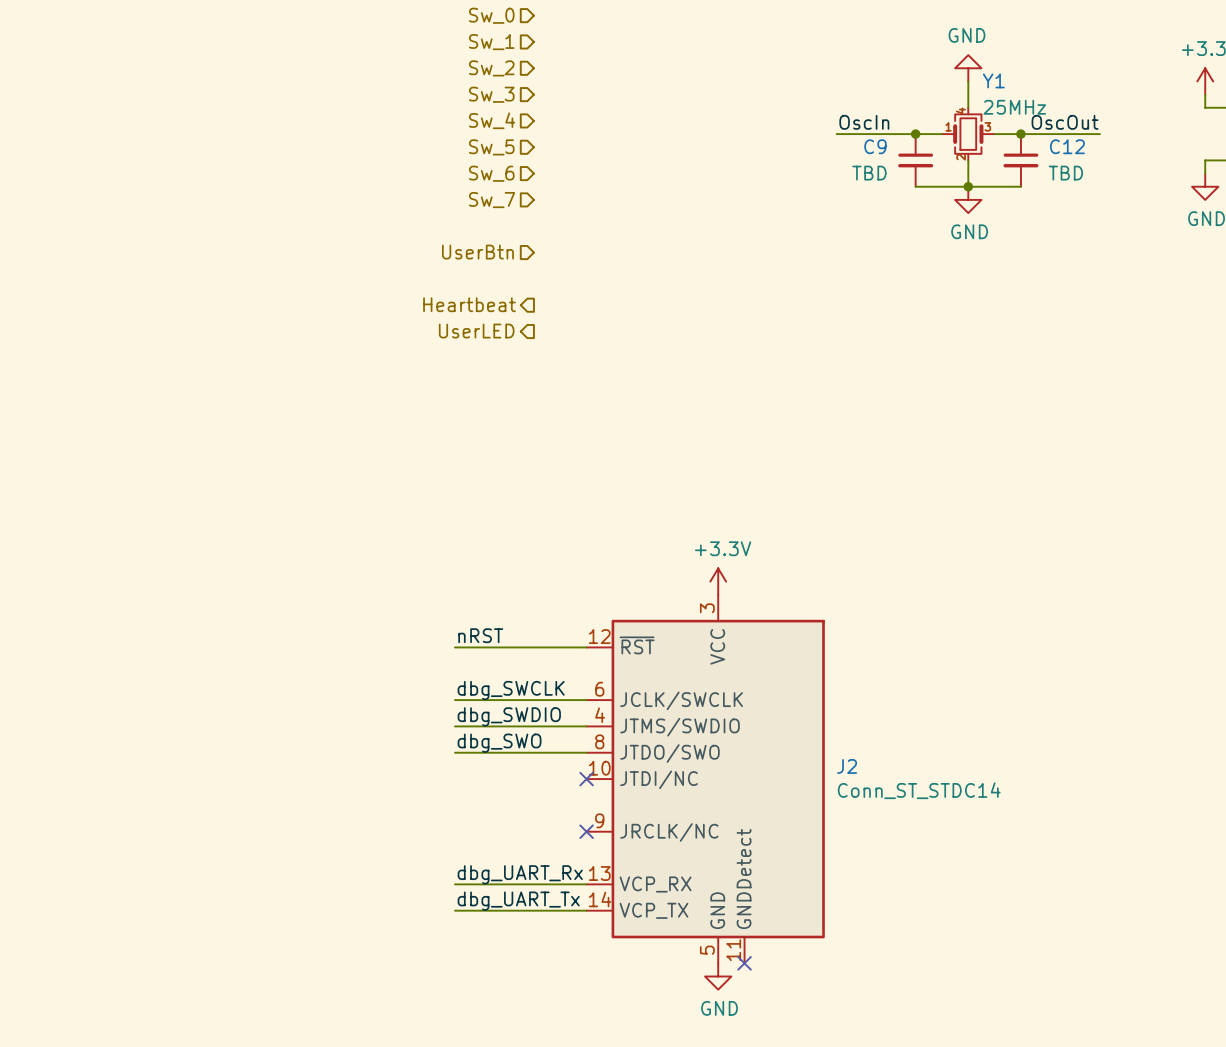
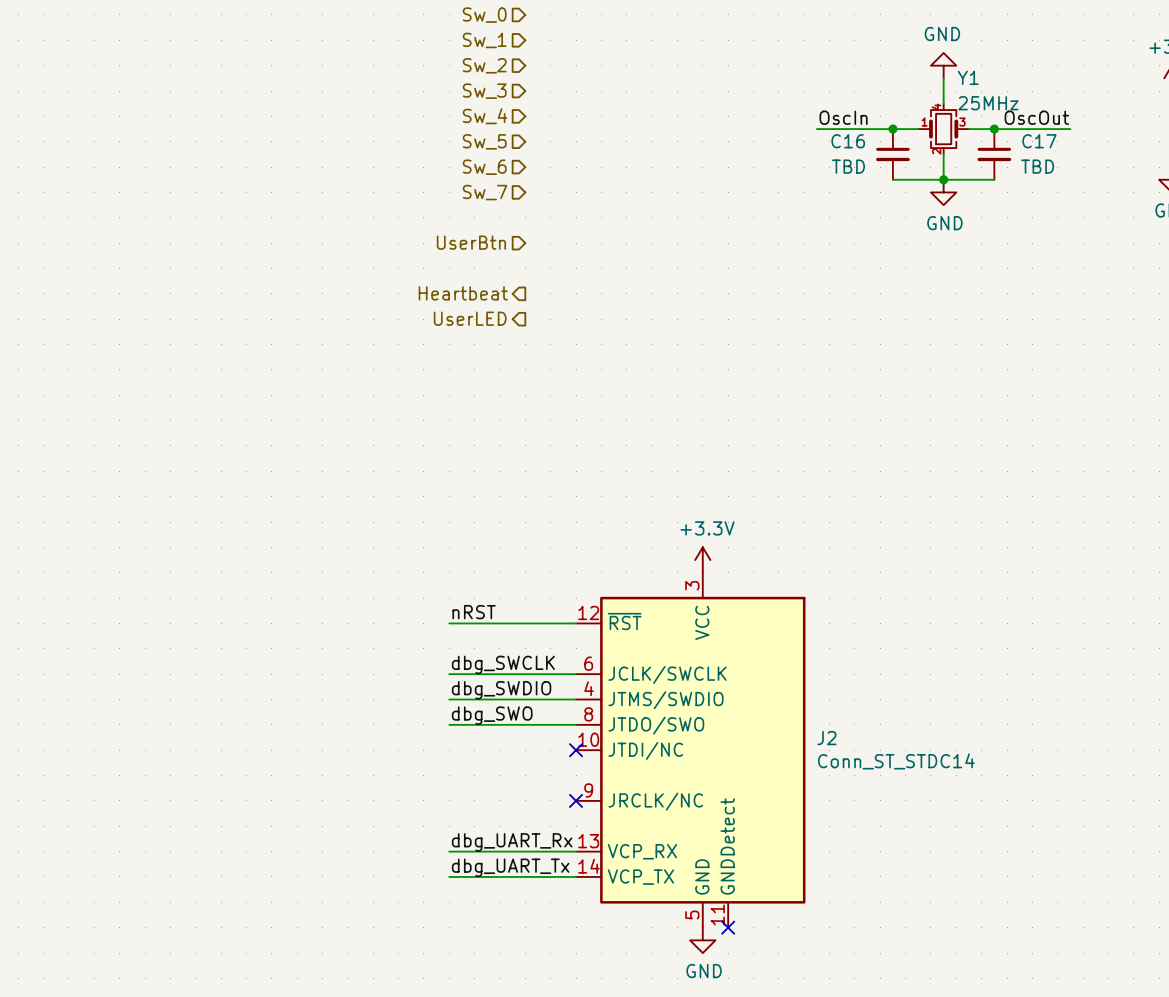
C9 name: C9 (875, 146) -> C16 (848, 141)
C12 name: C12 (1067, 146) -> C17 (1039, 141)

